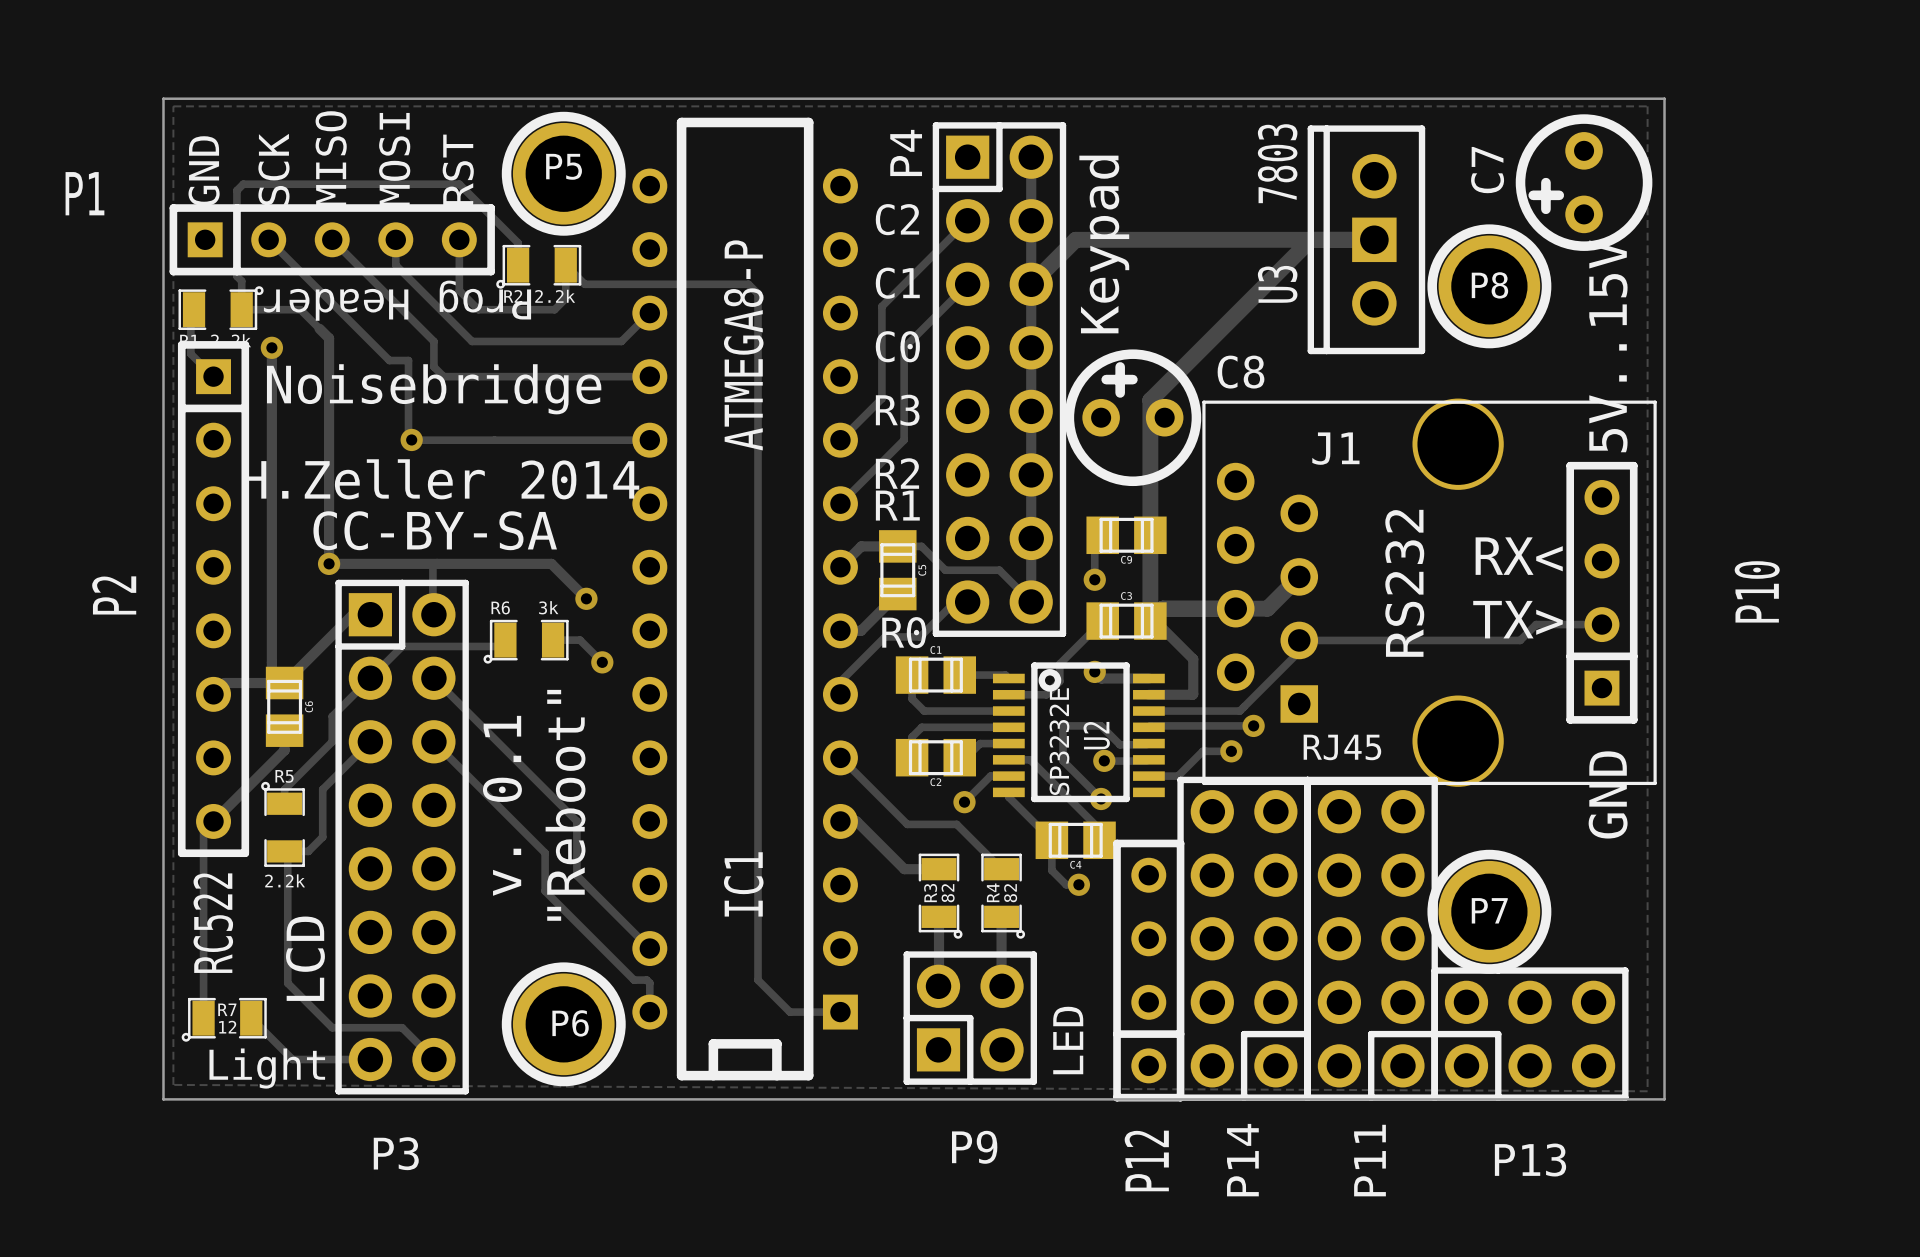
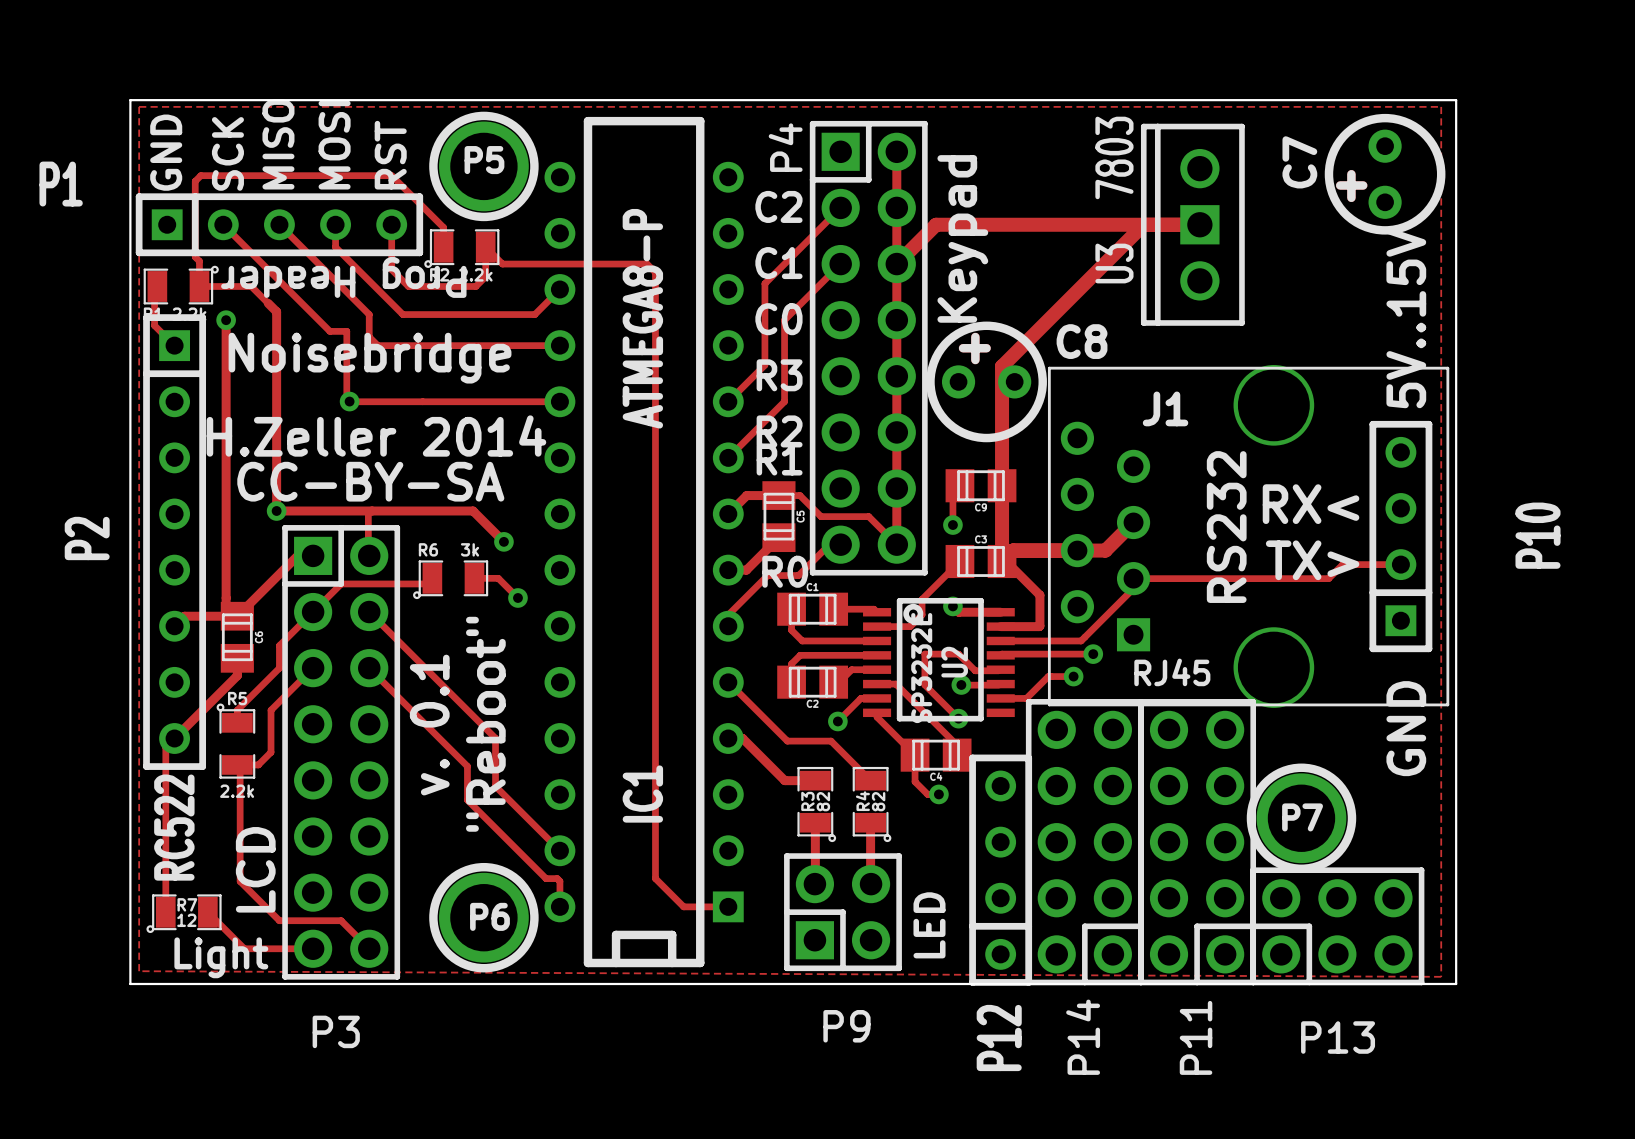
P8: (1489, 286) -> none

